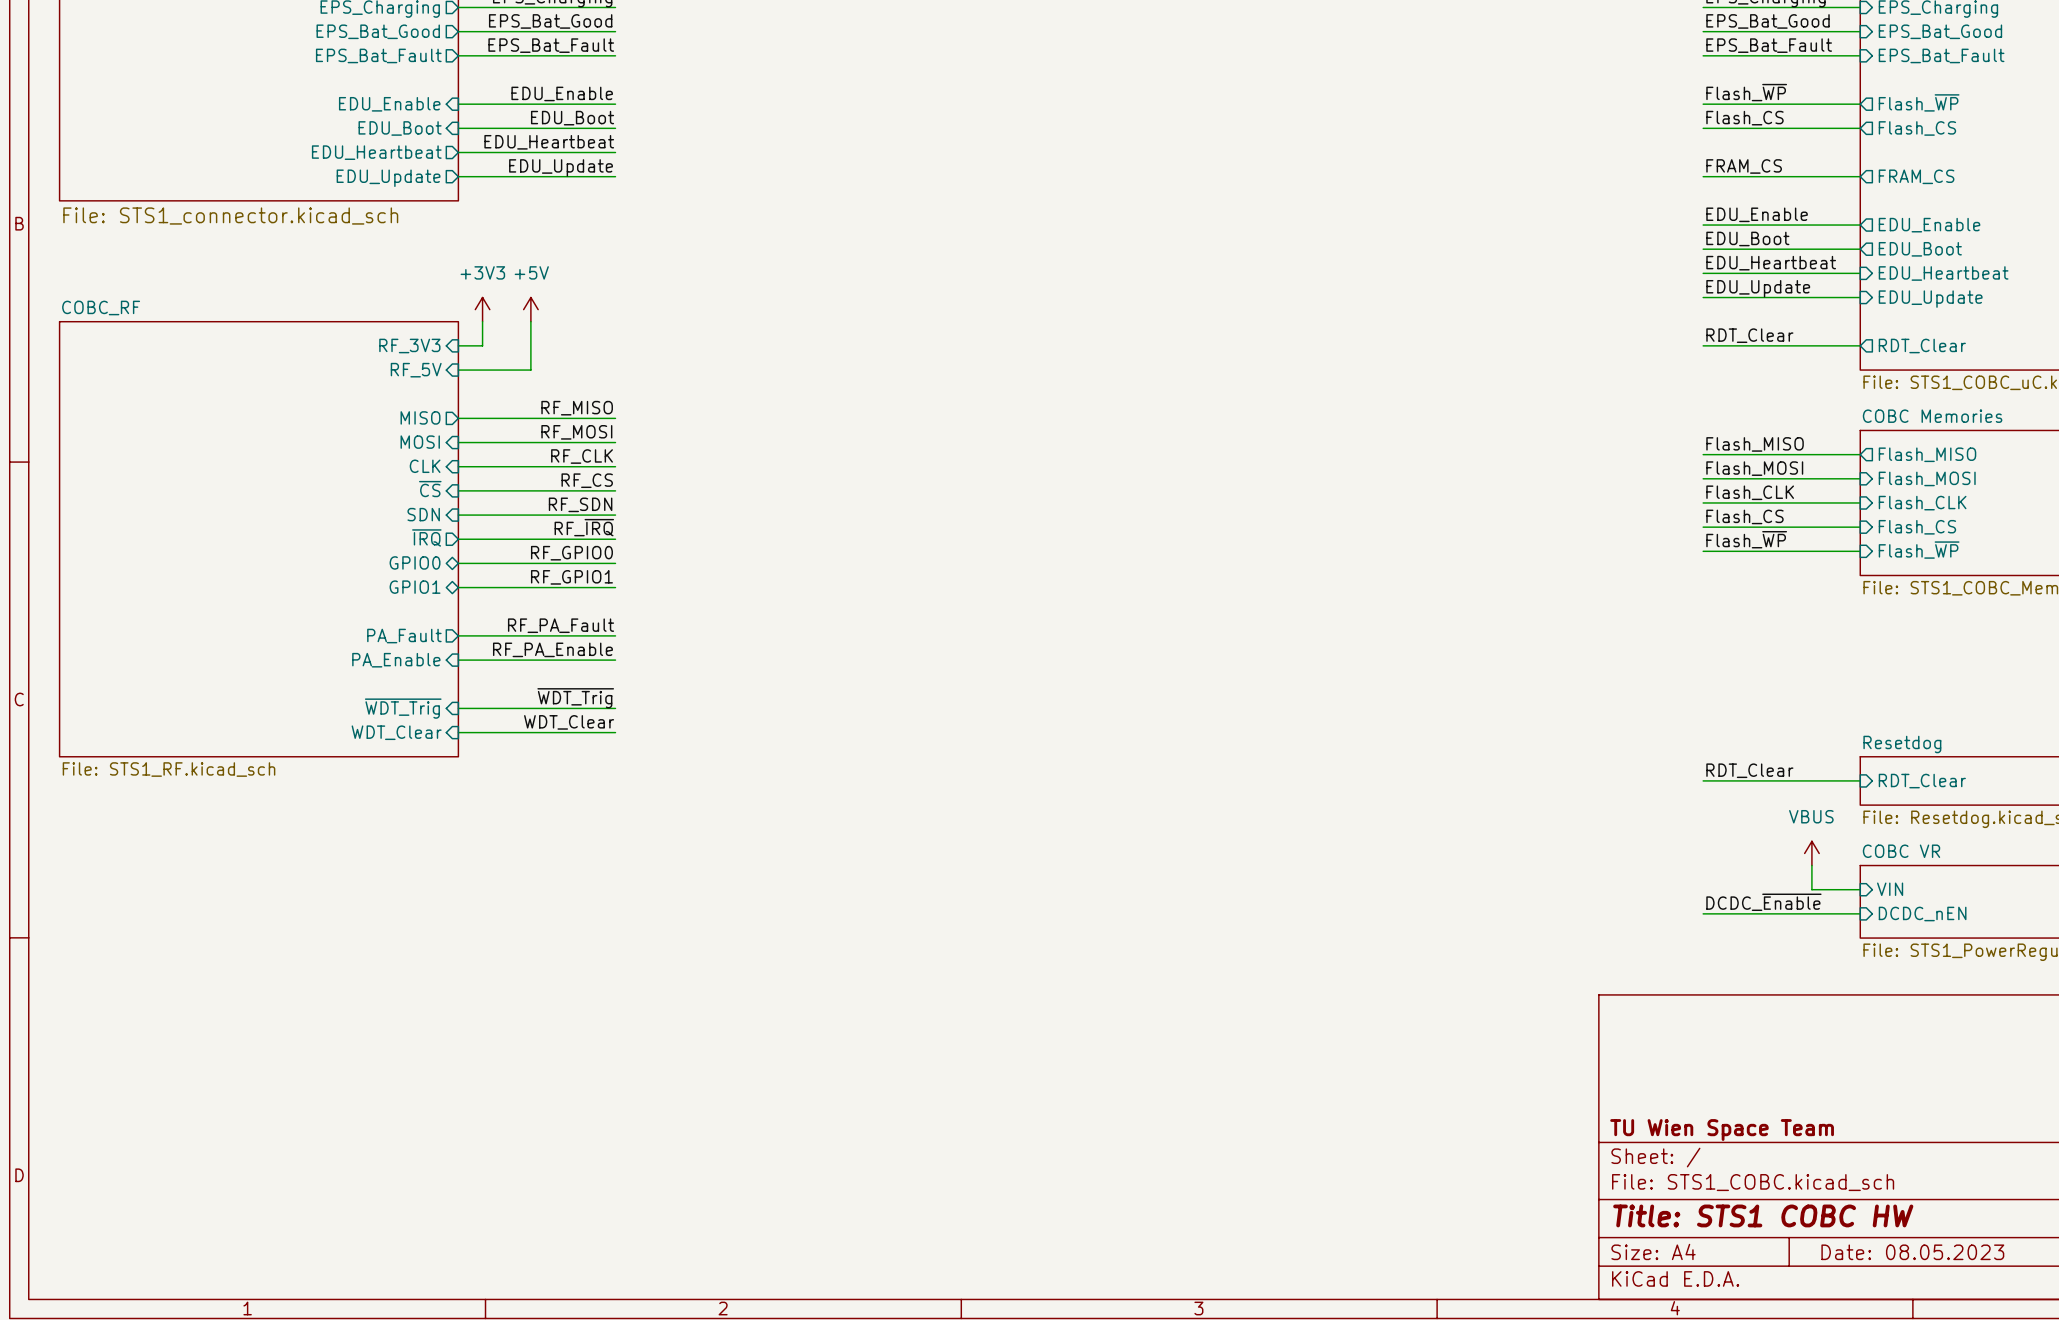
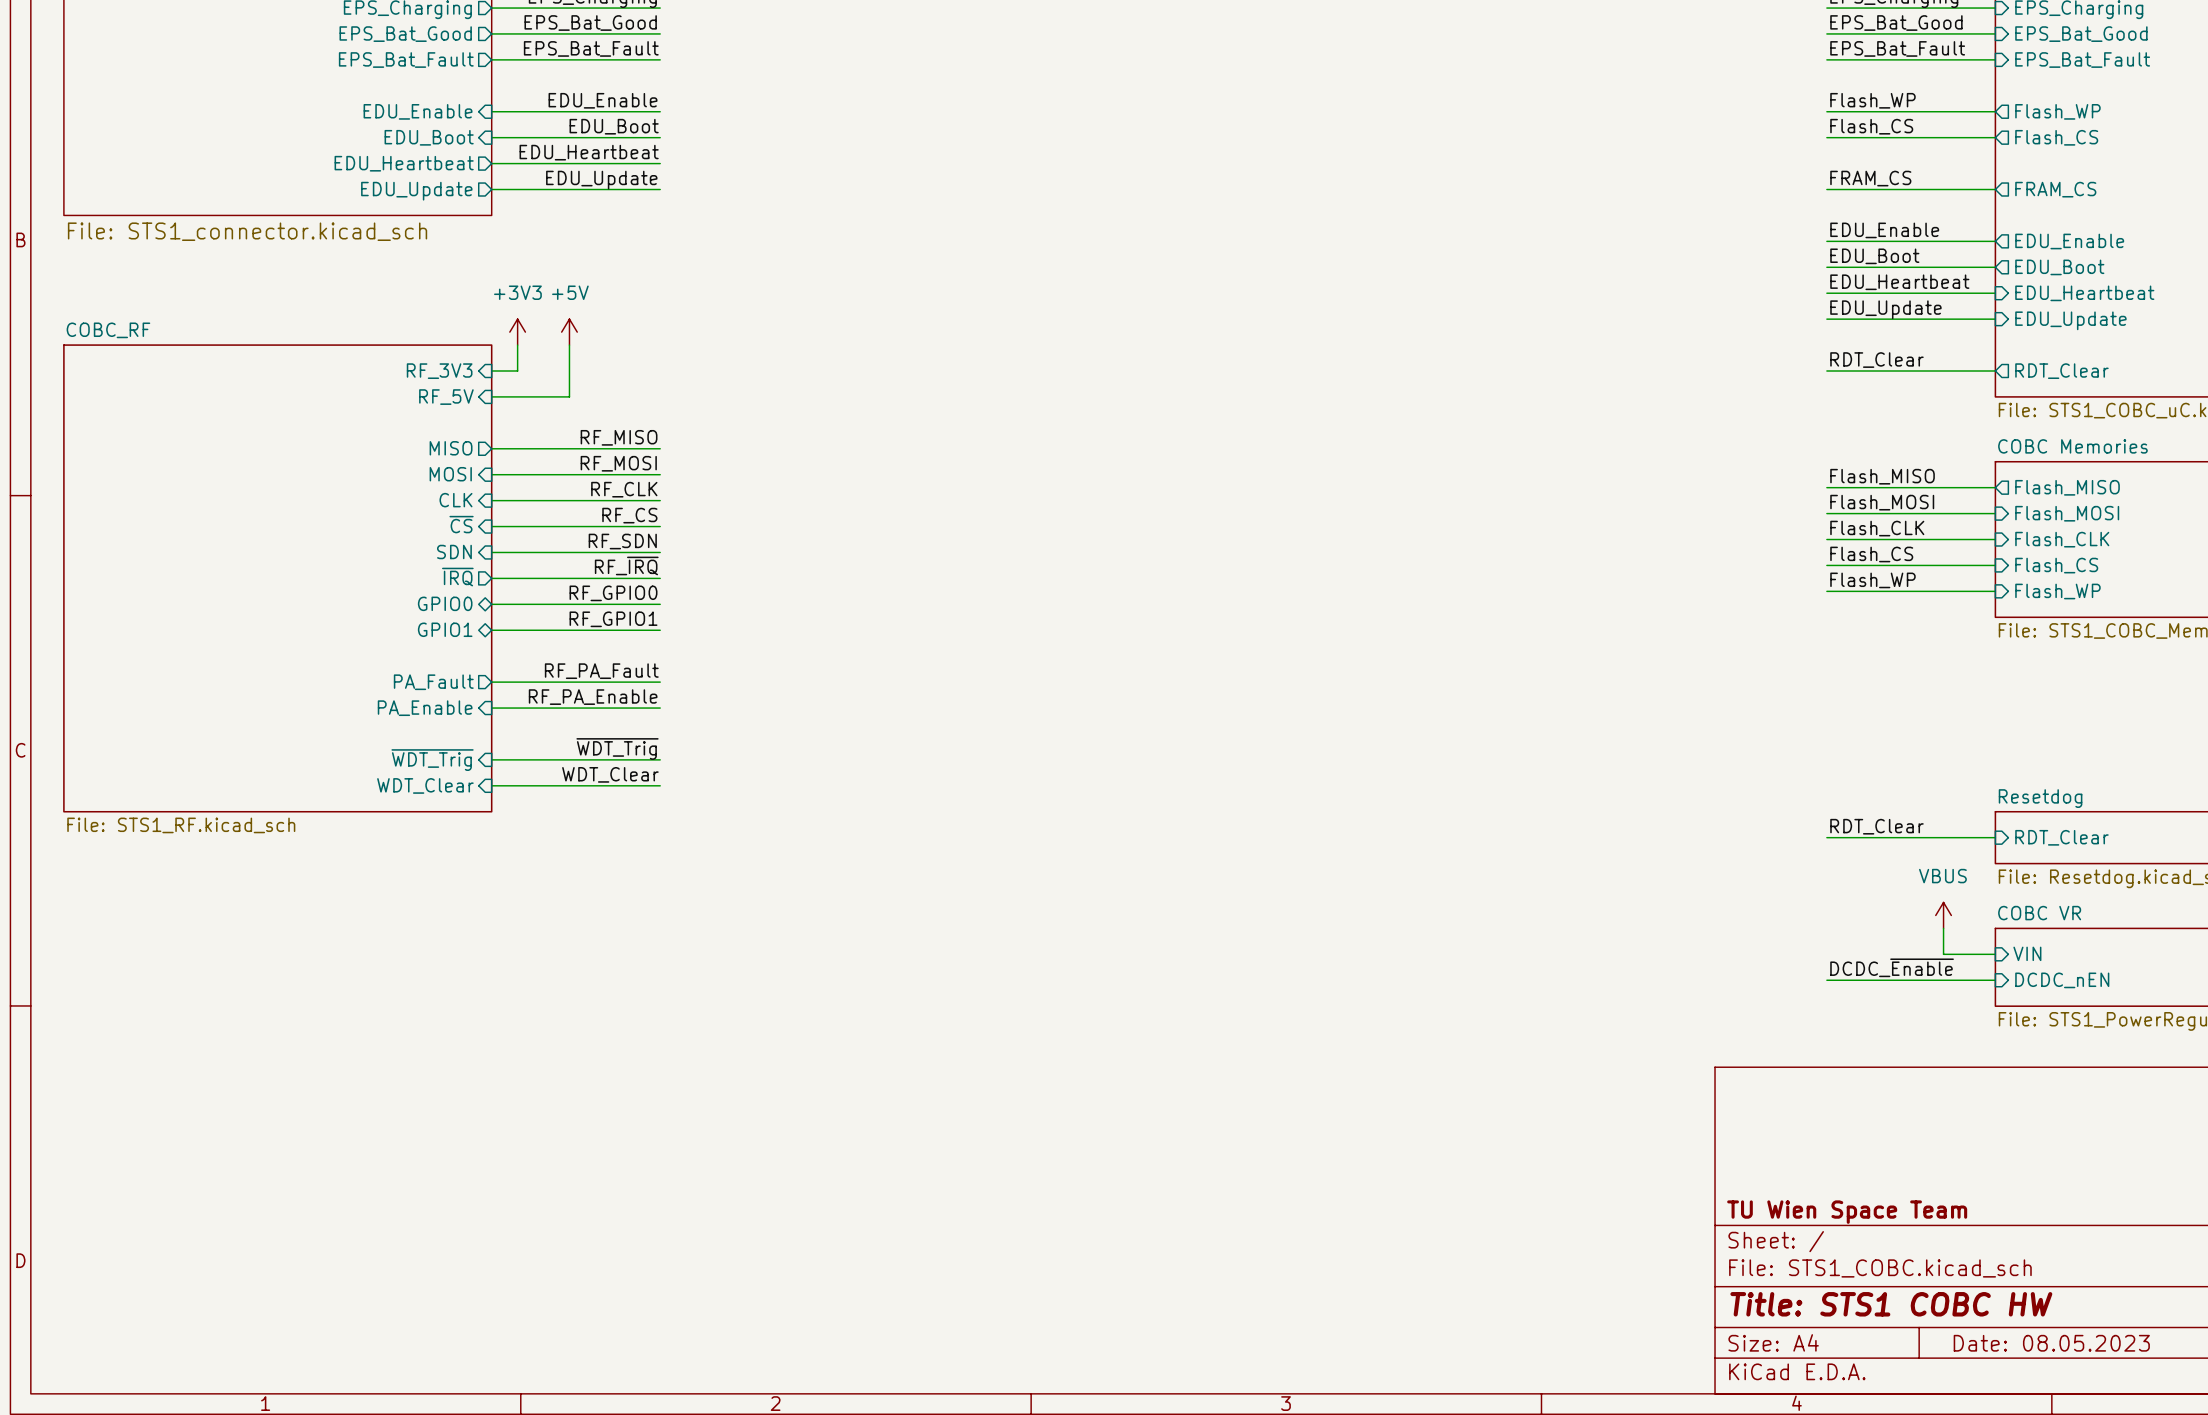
label: Flash_~{WP} (1746, 92) -> Flash_WP (1872, 100)
sheet pin: Flash_~{WP} (1919, 102) -> Flash_WP (2057, 111)
label: Flash_~{WP} (1746, 539) -> Flash_WP (1872, 580)
sheet pin: Flash_~{WP} (1919, 550) -> Flash_WP (2057, 591)

